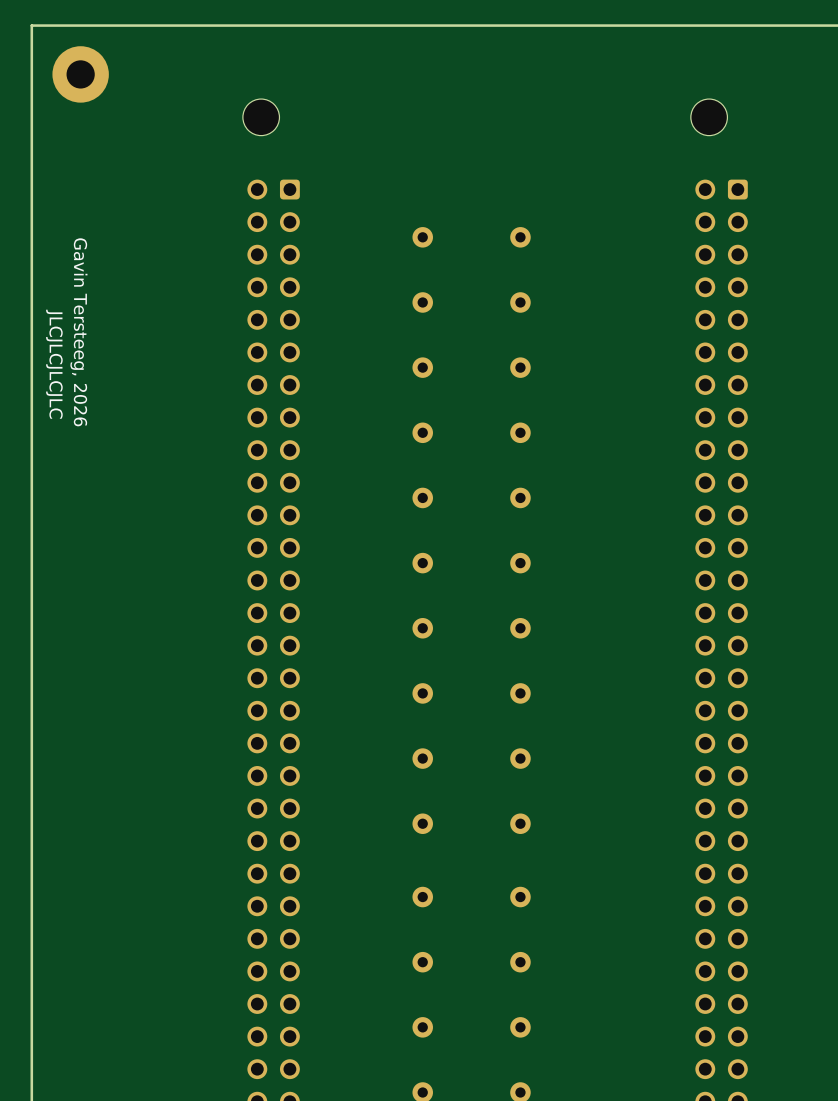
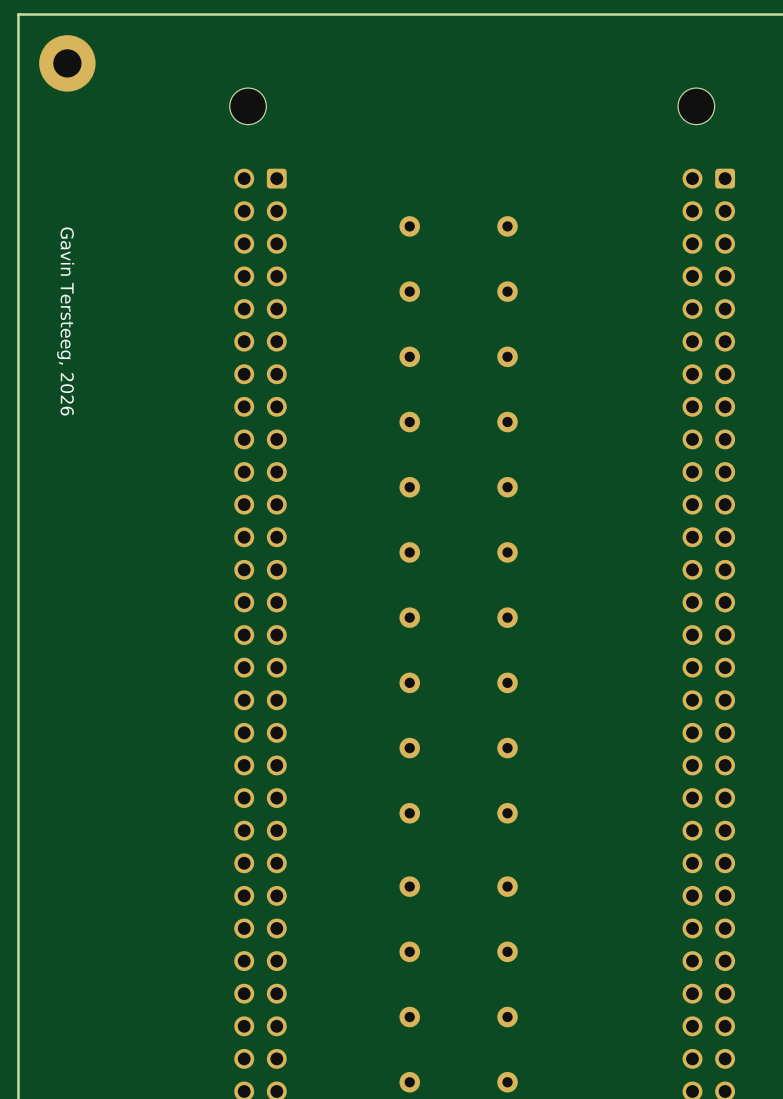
text: JLCJLCJLCJLC (54, 364) -> none

